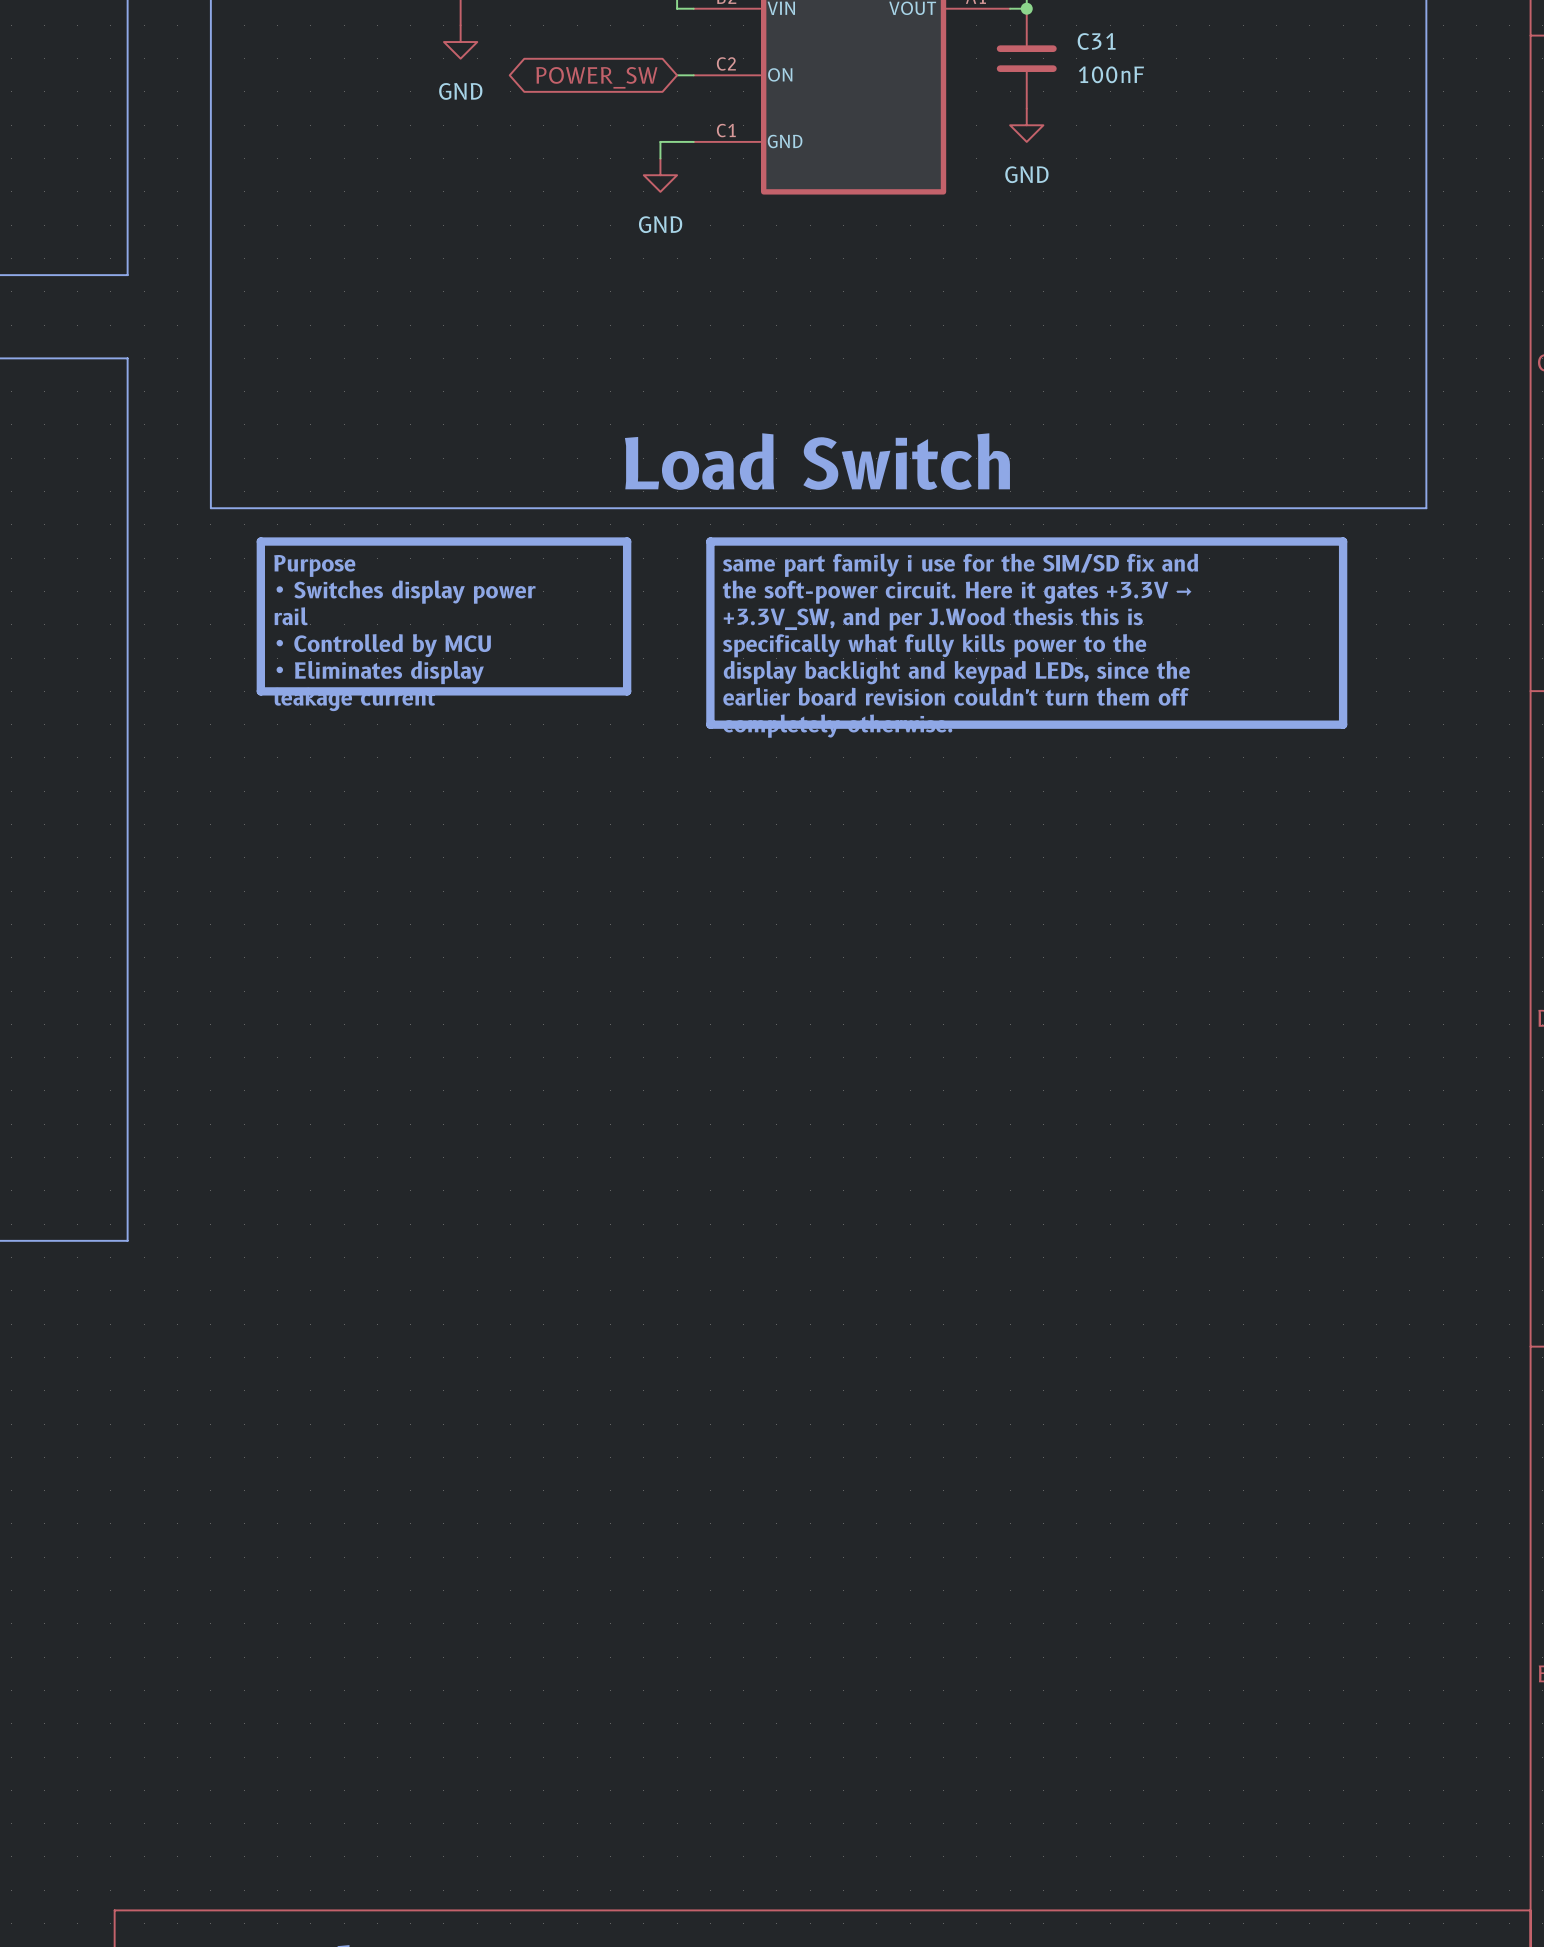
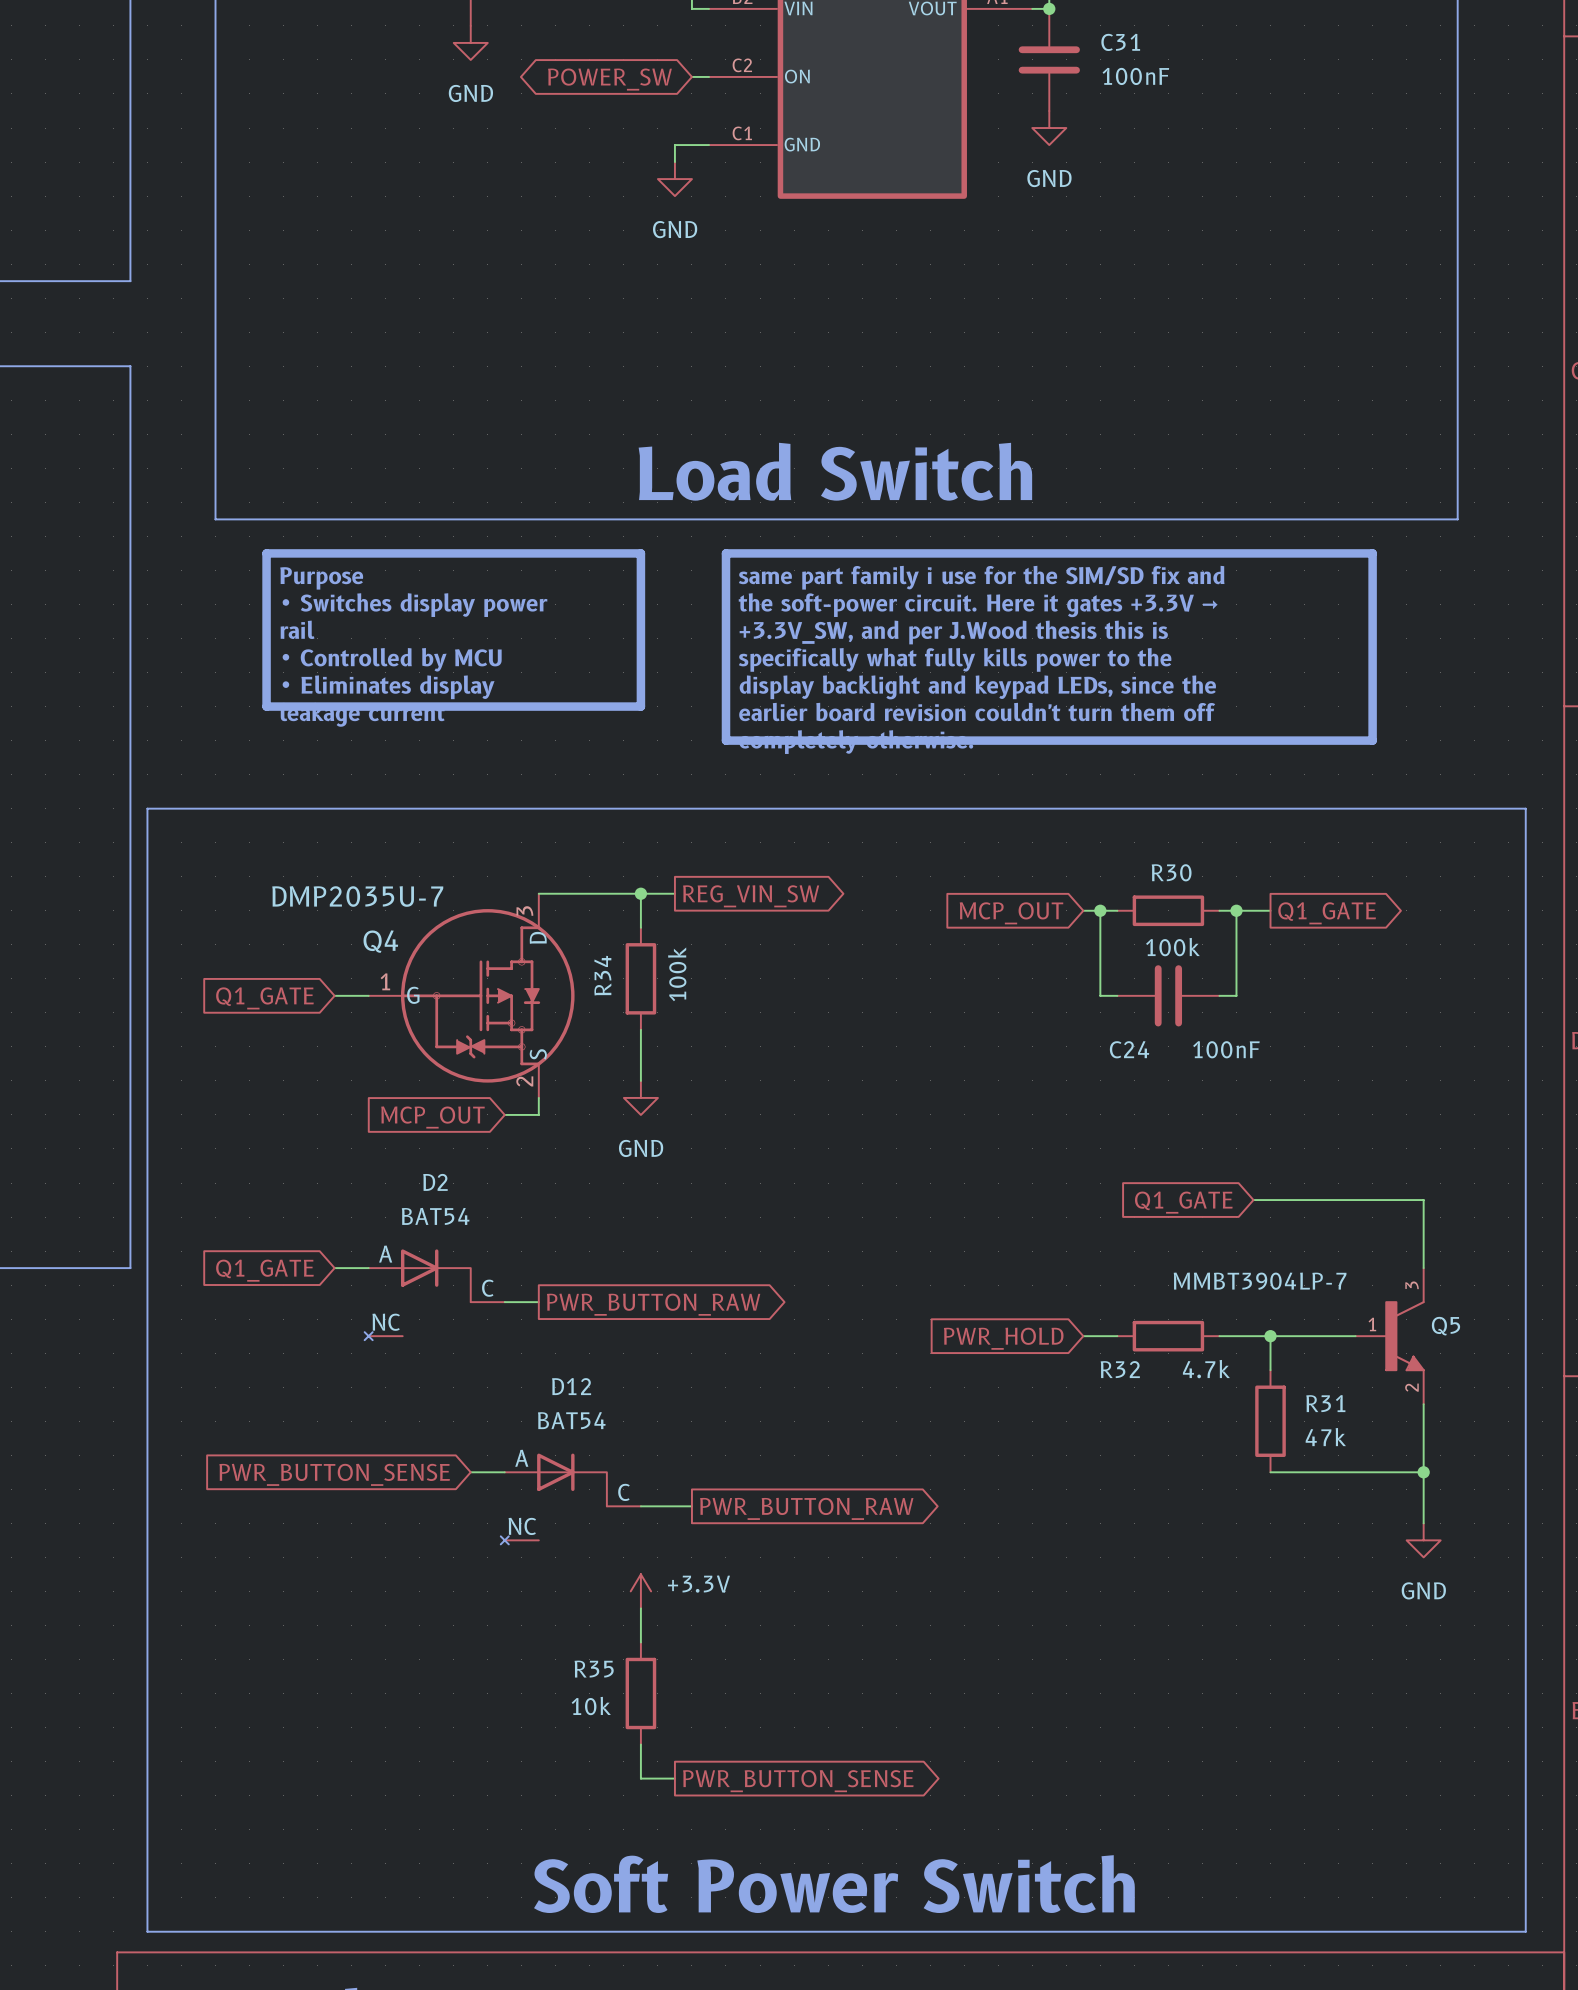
line: none -> (147, 808) (1525, 808) (1525, 1931) (147, 1931) (147, 808)
wire: none -> (538, 893) (674, 893)
wire: none -> (640, 893) (640, 927)
junction: none -> (640, 893)
global label: none -> REG_VIN_SW (751, 896)
wire: none -> (1083, 910) (1117, 910)
wire: none -> (1100, 910) (1100, 995) (1117, 995)
junction: none -> (1100, 910)
R30: none -> 100k (1168, 910)
wire: none -> (1219, 910) (1270, 910)
wire: none -> (1236, 910) (1236, 995) (1219, 995)
junction: none -> (1236, 910)
global label: none -> MCP_OUT (1011, 913)
global label: none -> Q1_GATE (1327, 913)
R34: none -> 100k (640, 978)
wire: none -> (334, 995) (368, 995)
Q4: none -> DMP2035U-7 (471, 995)
C24: none -> 100nF (1168, 995)
global label: none -> Q1_GATE (264, 998)
wire: none -> (640, 1029) (640, 1080)
wire: none -> (538, 1097) (538, 1114) (504, 1114)
power symbol: none -> GND (640, 1097)
global label: none -> MCP_OUT (432, 1117)
wire: none -> (1253, 1200) (1423, 1200) (1423, 1268)
global label: none -> Q1_GATE (1183, 1202)
wire: none -> (334, 1268) (368, 1268)
global label: none -> Q1_GATE (264, 1270)
D2: none -> BAT54 (434, 1294)
wire: none -> (504, 1302) (538, 1302)
global label: none -> PWR_BUTTON_RAW (653, 1304)
wire: none -> (1083, 1336) (1117, 1336)
R32: none -> 4.7k (1168, 1336)
wire: none -> (1219, 1336) (1355, 1336)
wire: none -> (1270, 1336) (1270, 1370)
junction: none -> (1270, 1336)
Q5: none -> MMBT3904LP-7 (1390, 1336)
global label: none -> PWR_HOLD (1003, 1338)
wire: none -> (1423, 1404) (1423, 1523)
R31: none -> 47k (1270, 1421)
wire: none -> (470, 1472) (504, 1472)
wire: none -> (1270, 1472) (1423, 1472)
junction: none -> (1423, 1472)
global label: none -> PWR_BUTTON_SENSE (334, 1474)
D12: none -> BAT54 (570, 1498)
wire: none -> (640, 1506) (691, 1506)
global label: none -> PWR_BUTTON_RAW (806, 1508)
power symbol: none -> GND (1423, 1540)
power symbol: none -> +3.3V (640, 1591)
wire: none -> (640, 1608) (640, 1642)
R35: none -> 10k (640, 1693)
wire: none -> (640, 1744) (640, 1778) (674, 1778)
global label: none -> PWR_BUTTON_SENSE (798, 1781)
text: none -> Soft Power Switch (834, 1884)

